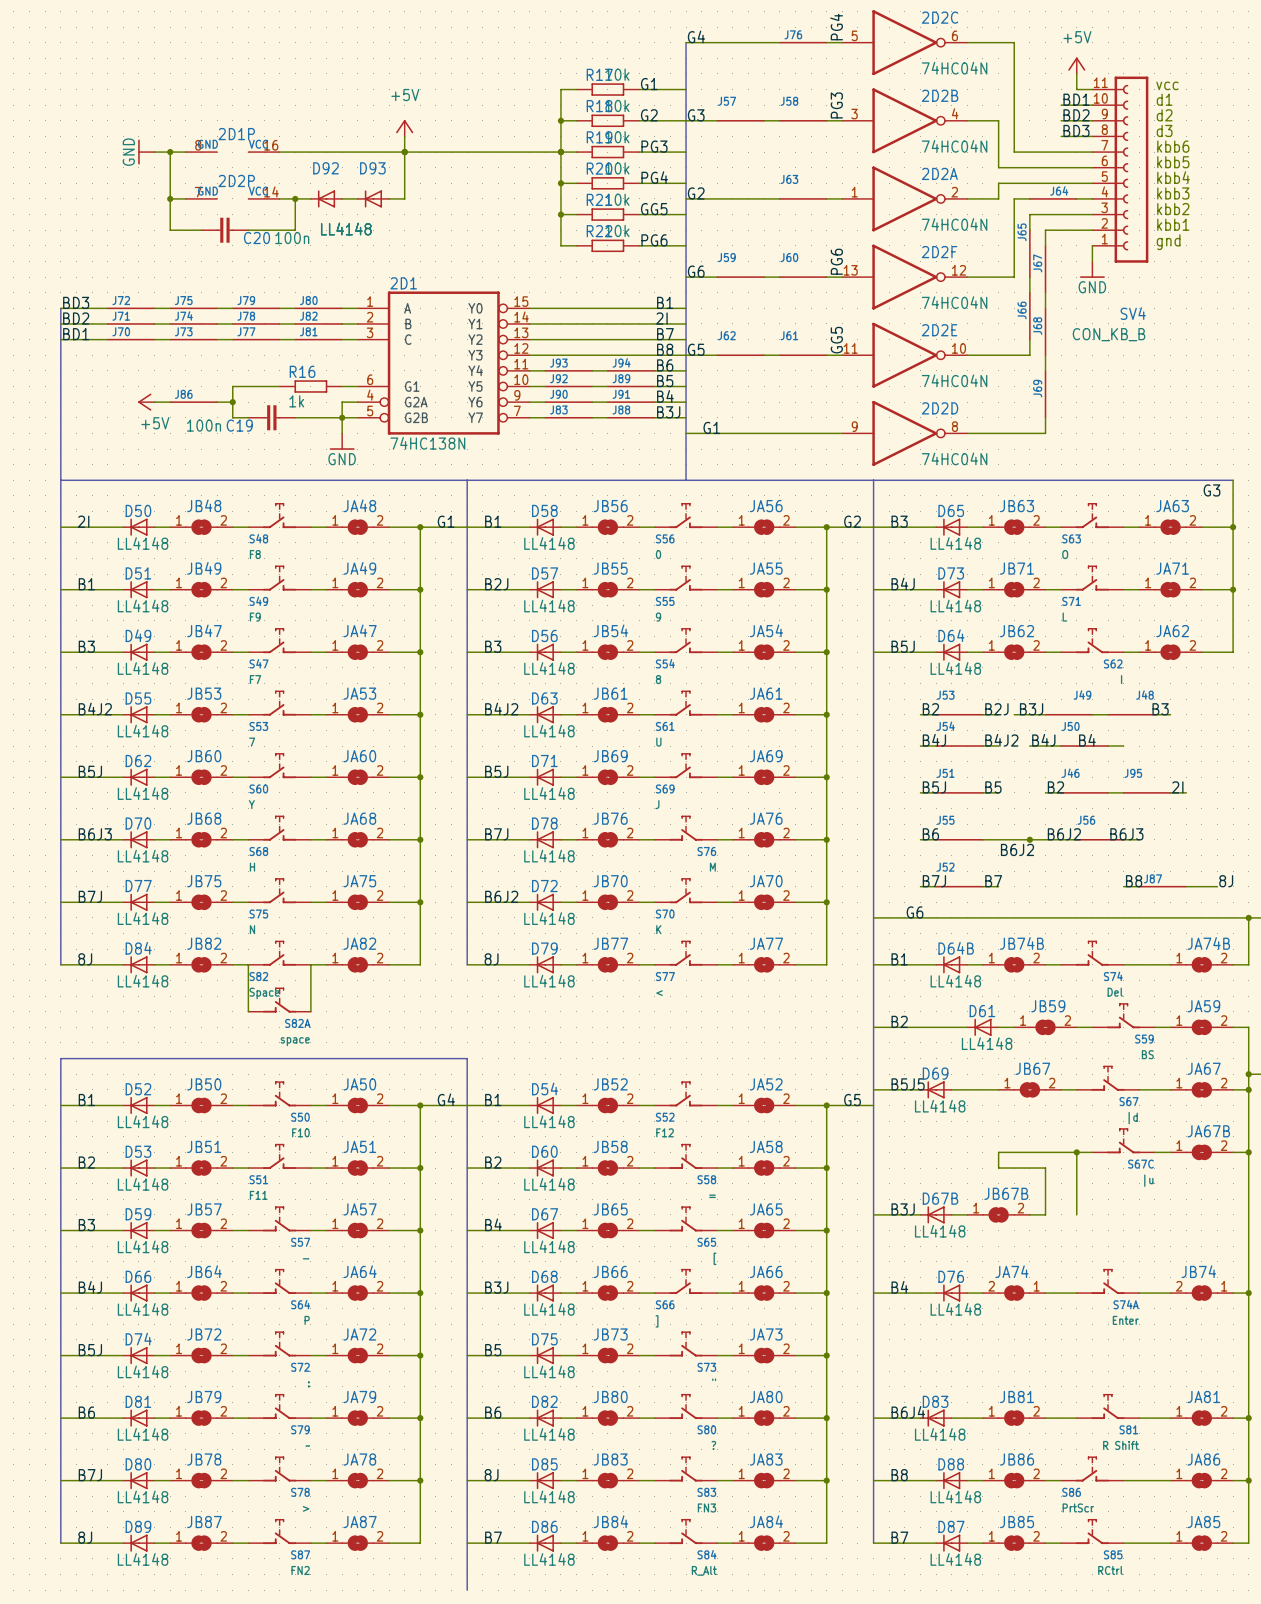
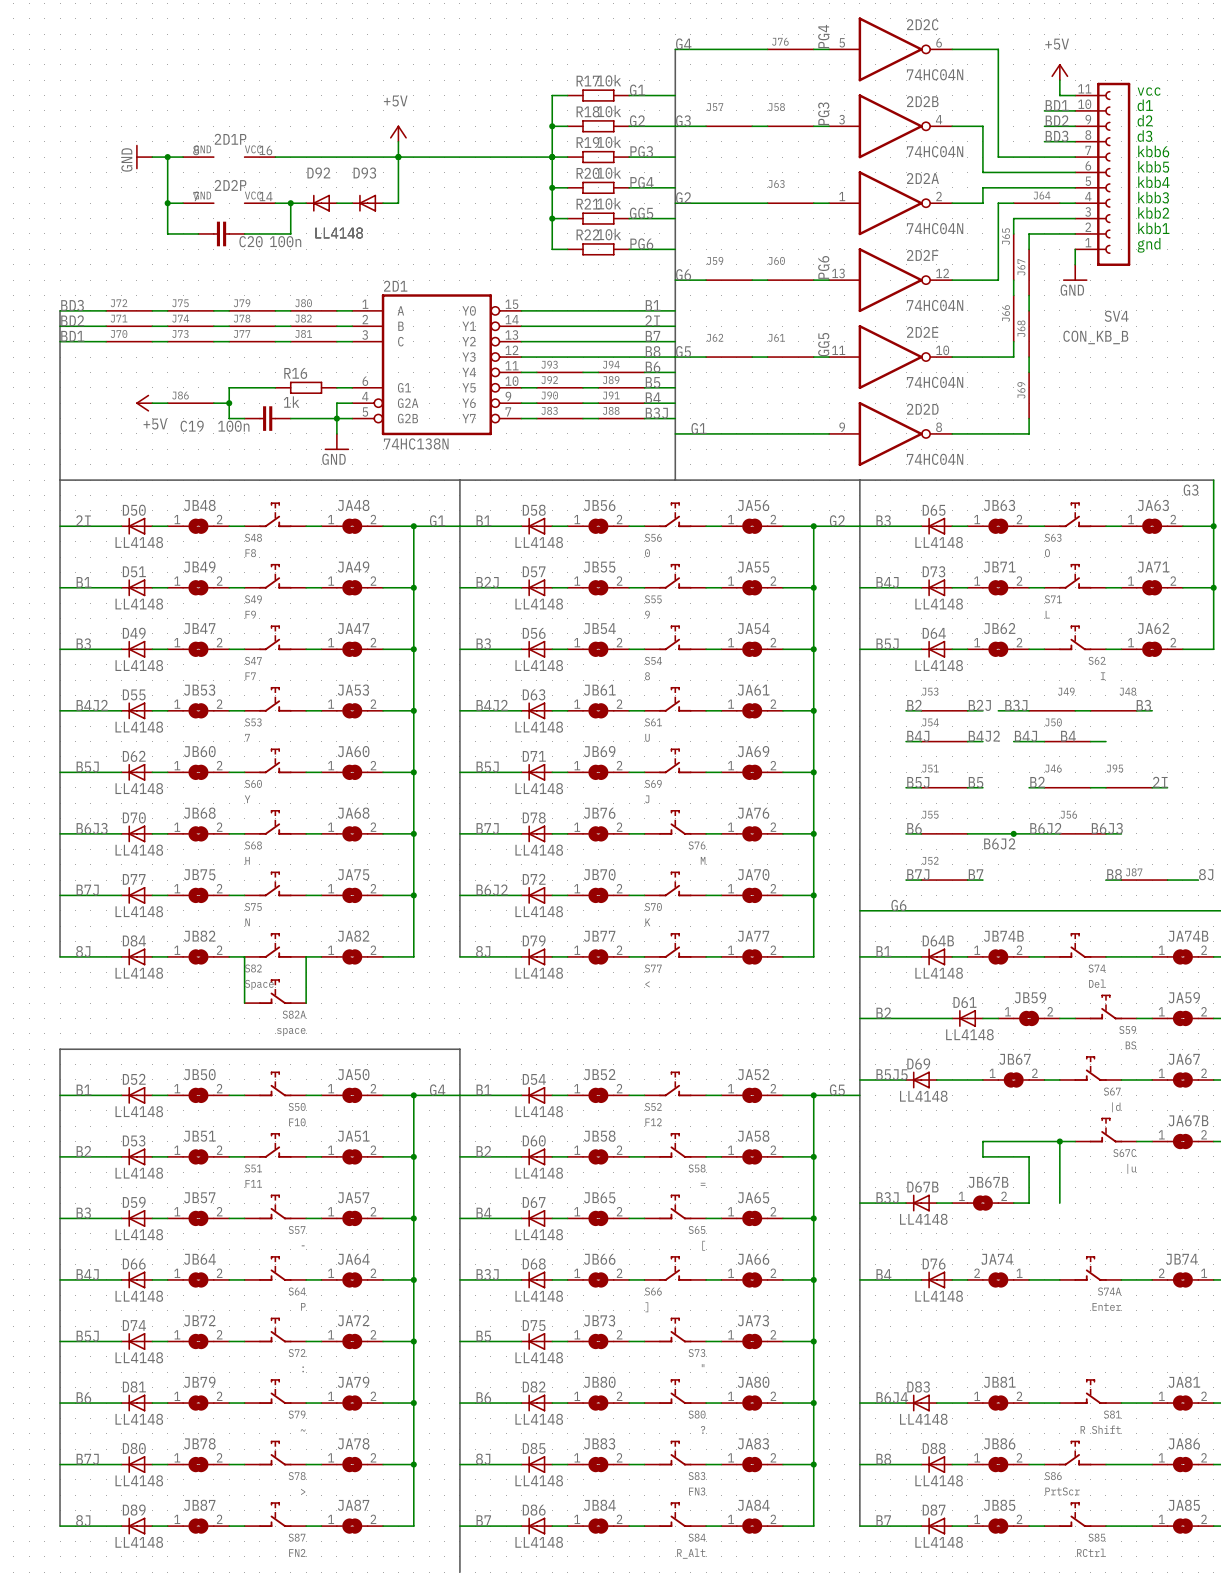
C19 value position: 100n (204, 425) -> 100n (233, 426)
C19 name position: C19 (239, 425) -> C19 (192, 426)

